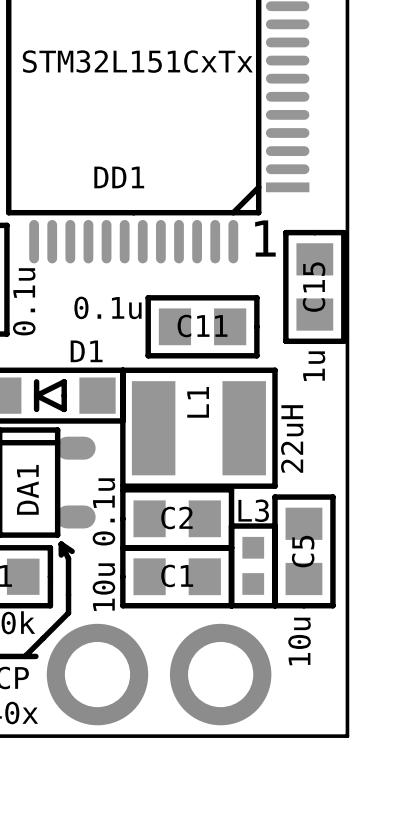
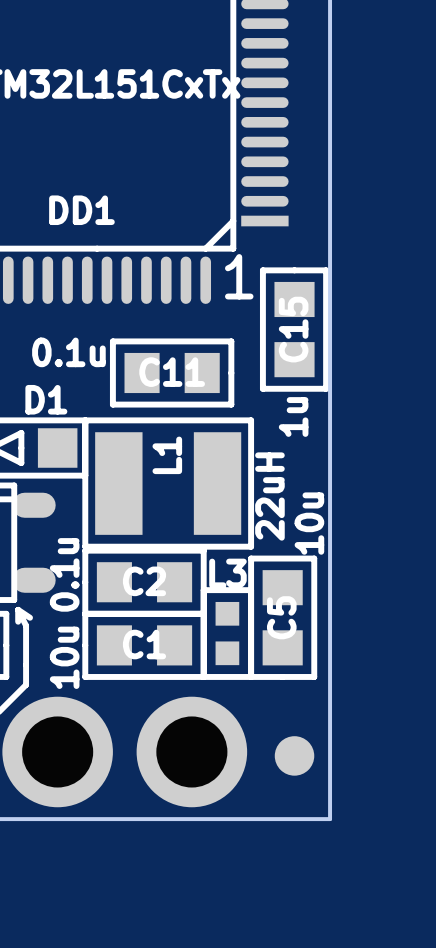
C5 value position: 10u (299, 641) -> 10u (309, 523)
part: none -> (294, 755)

